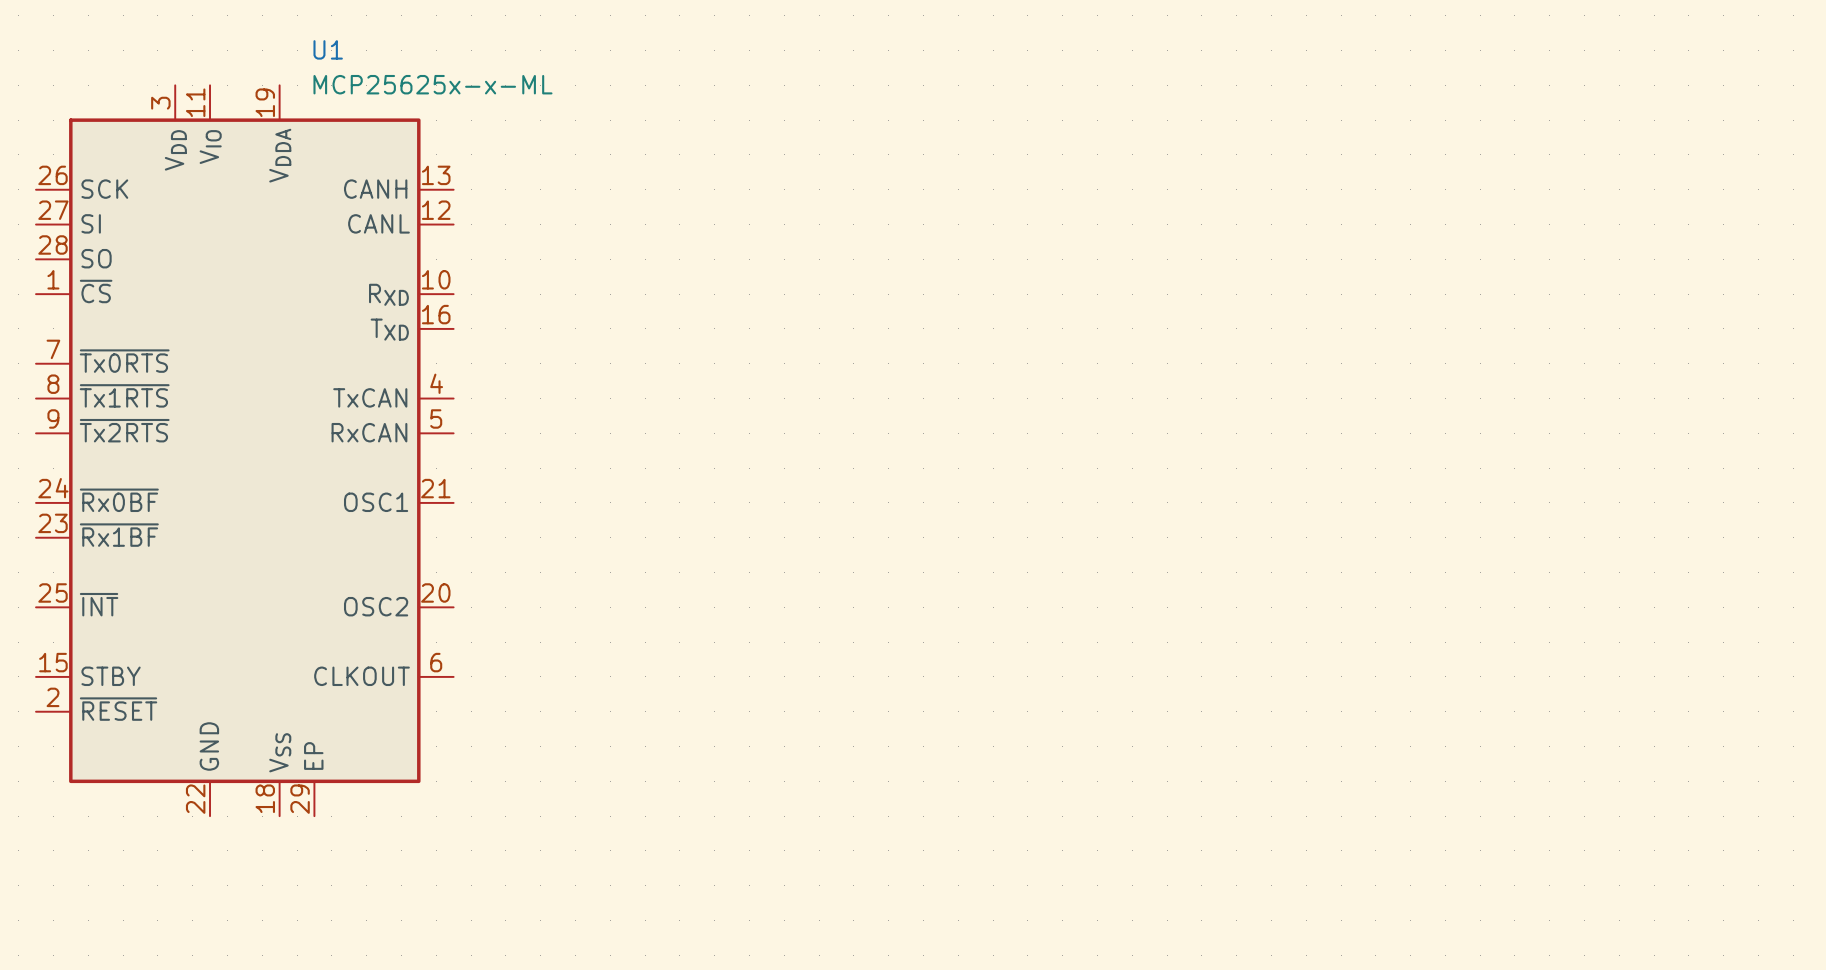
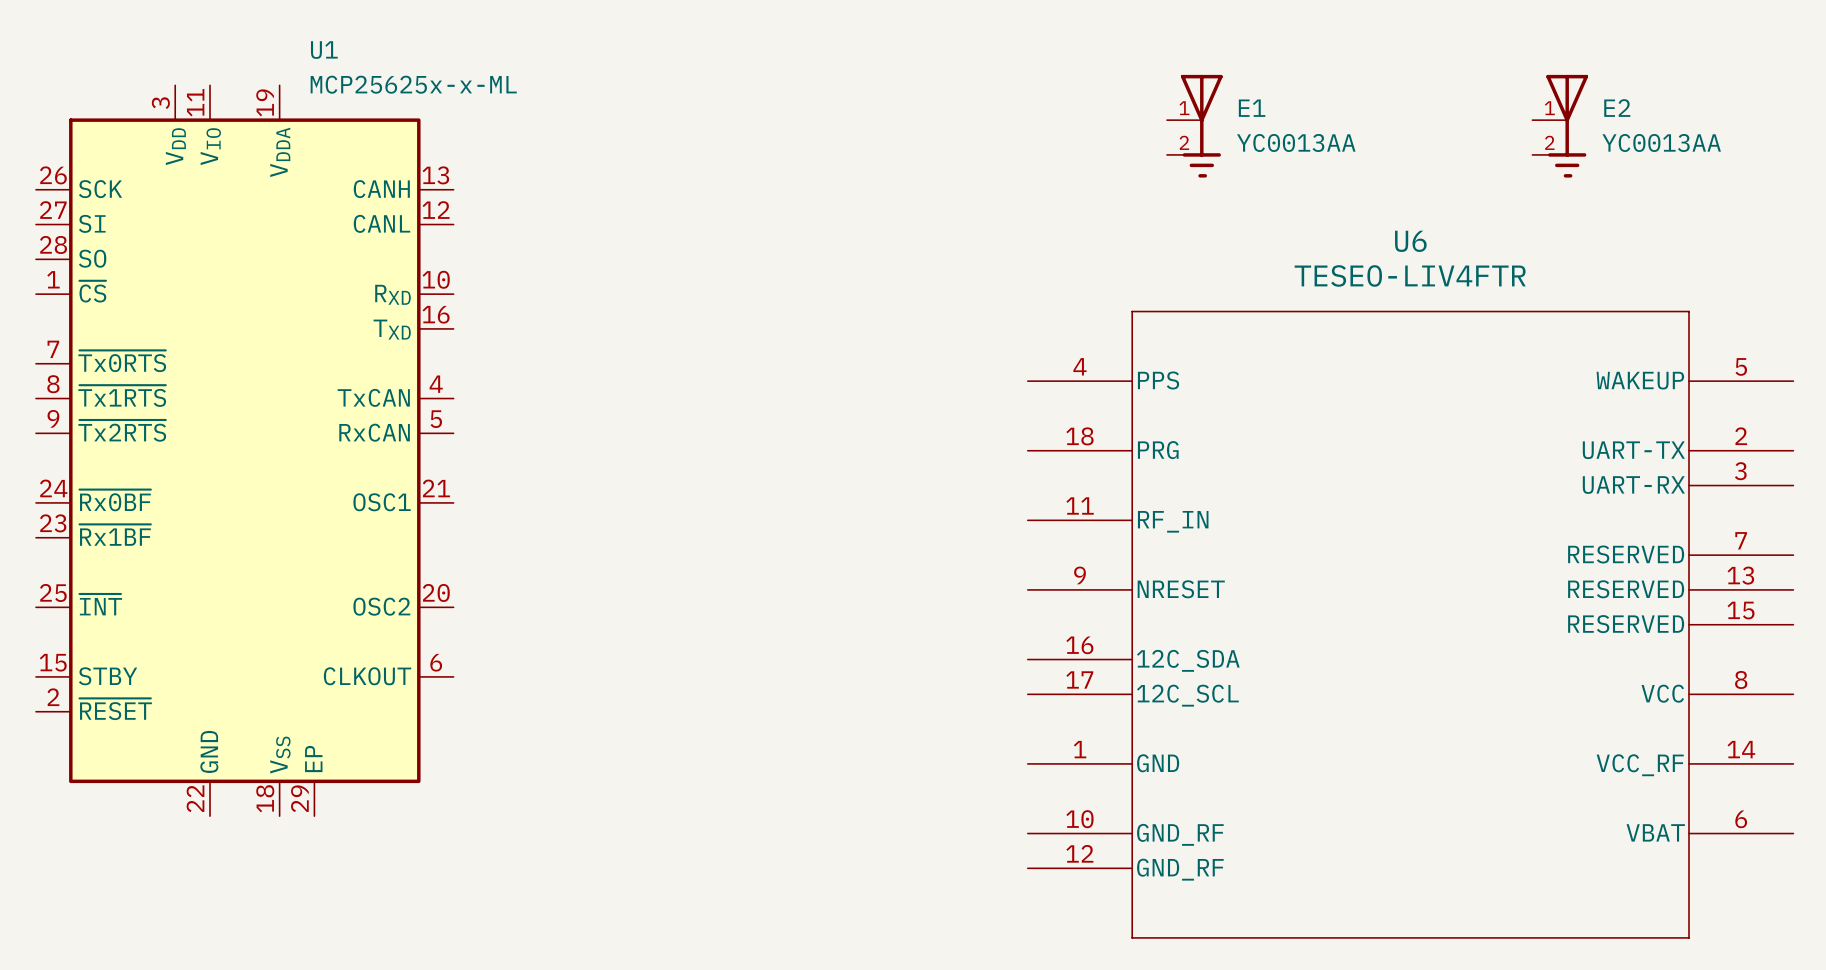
E1: none -> YC0013AA (1194, 126)
E2: none -> YC0013AA (1560, 126)
U6: none -> TESEO-LIV4FTR (1410, 624)

